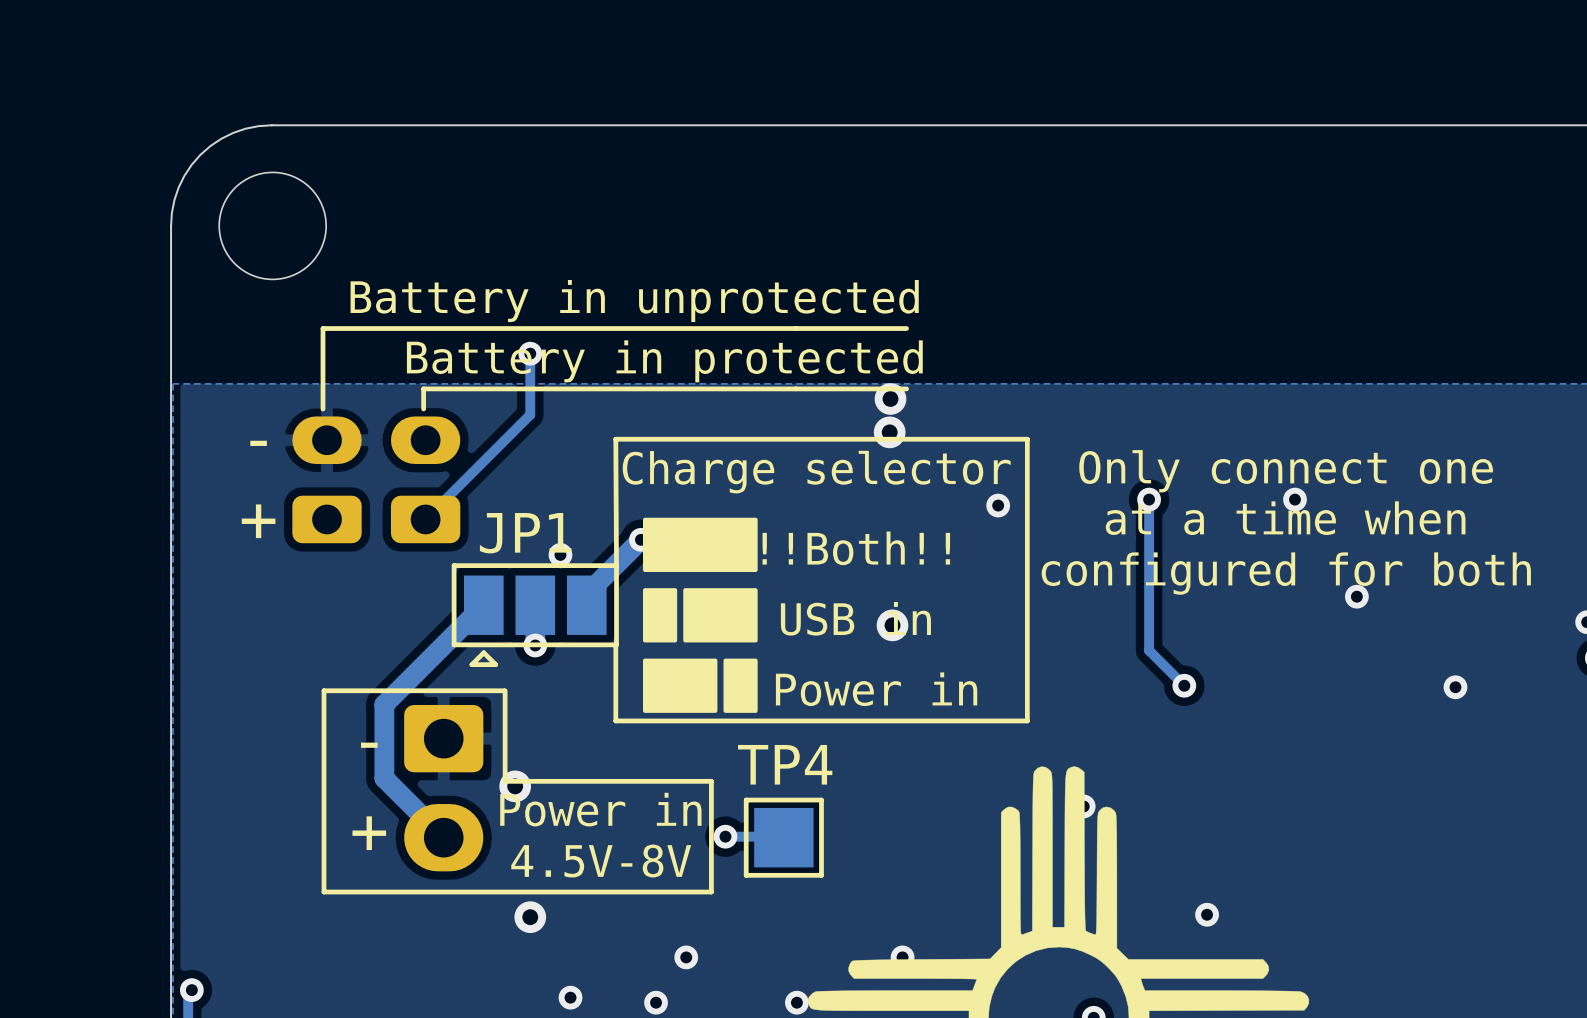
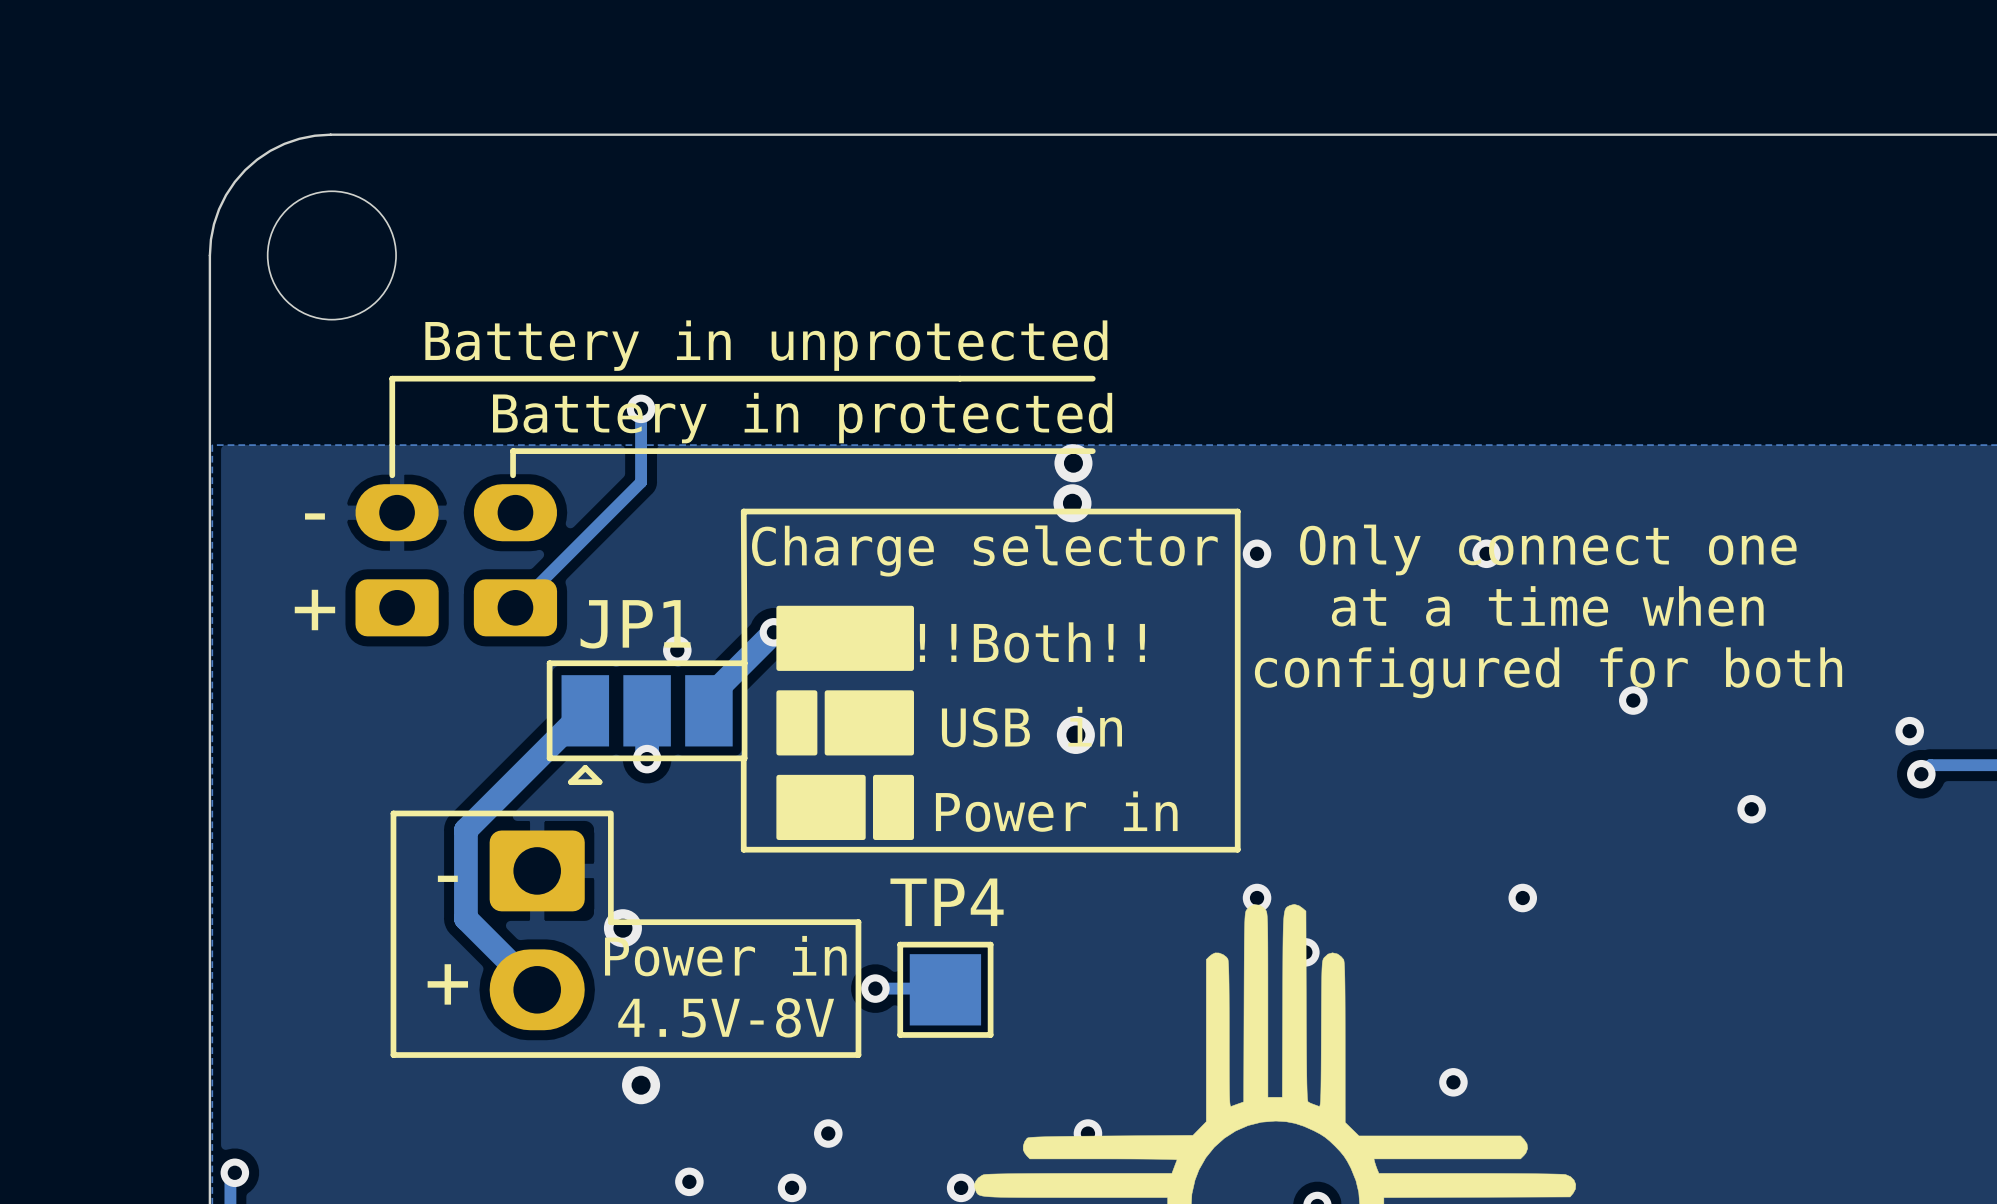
via: none -> (1257, 553)
via: none -> (1486, 553)
track: (1149, 499) (1149, 650) (1184, 685) -> none
via: (1149, 499) -> none
via: (1295, 499) -> none
via: (998, 505) -> none
via: (1184, 685) -> none
via: none -> (1257, 898)
via: none -> (1522, 898)

